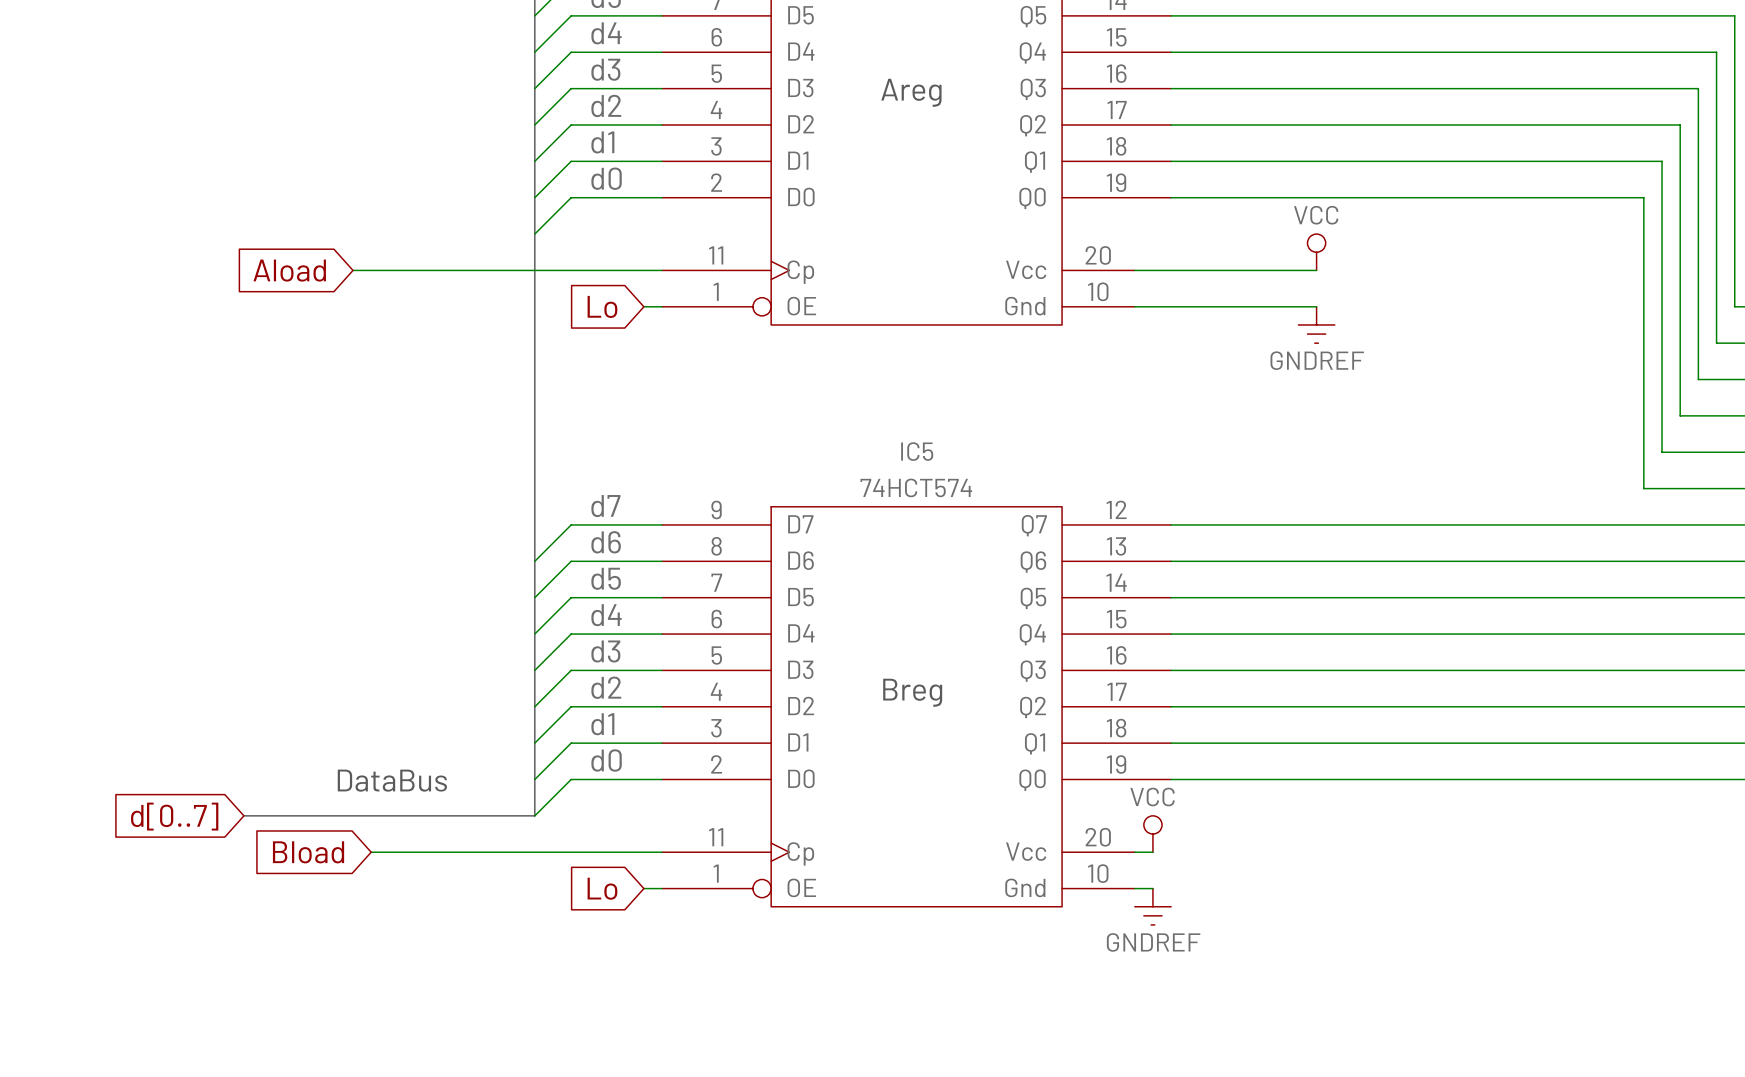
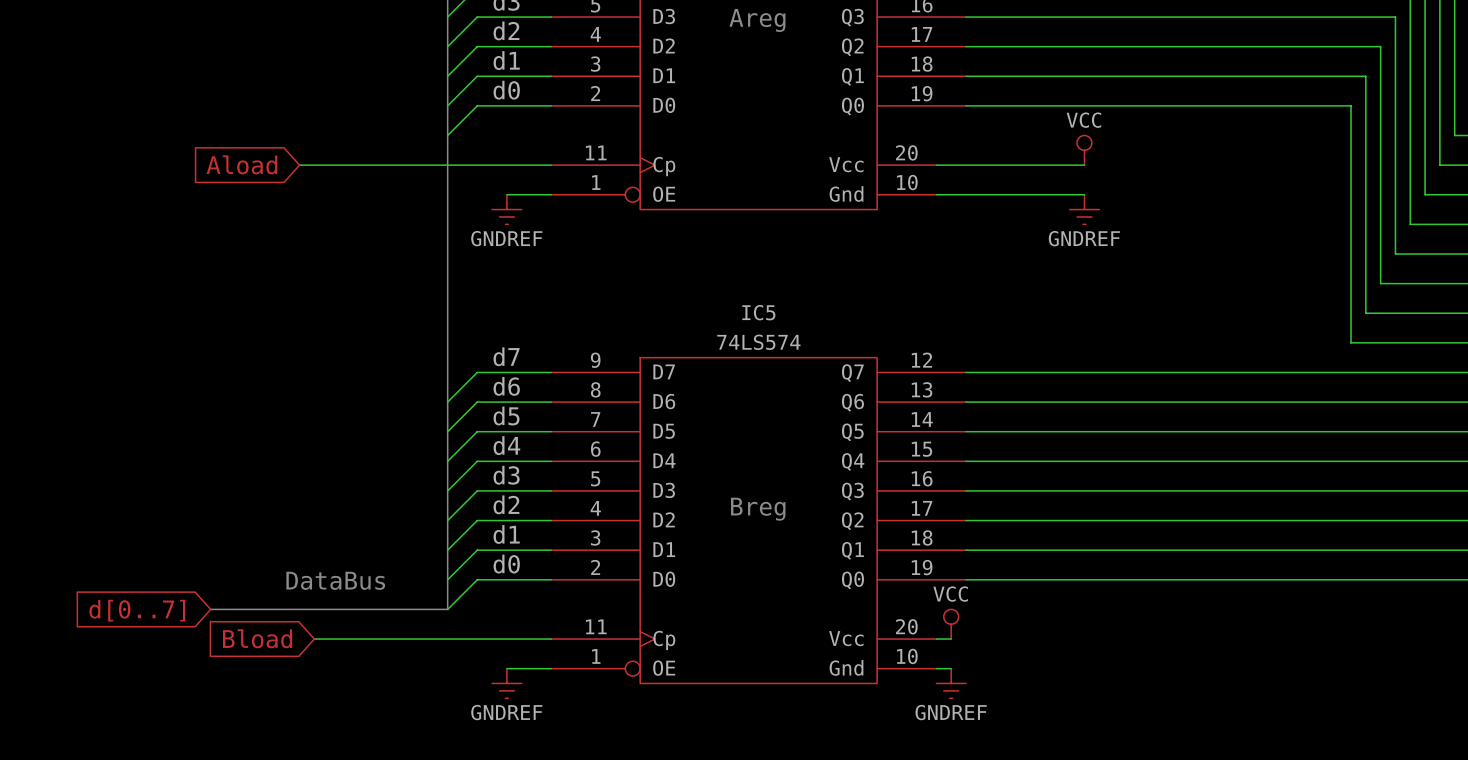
global label: Lo (602, 306) -> none
wire: none -> (506, 194) (536, 194)
power symbol: none -> GNDREF (506, 209)
IC5 value: 74HCT574 (916, 487) -> 74LS574 (758, 342)
global label: Lo (602, 888) -> none
wire: none -> (506, 668) (536, 668)
power symbol: none -> GNDREF (506, 683)

